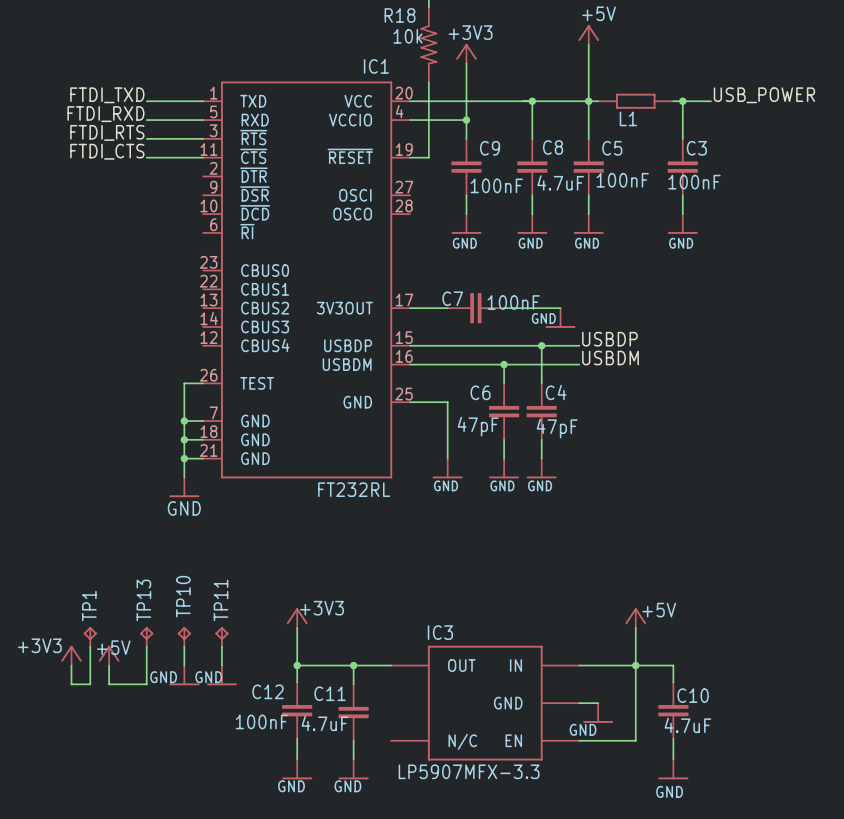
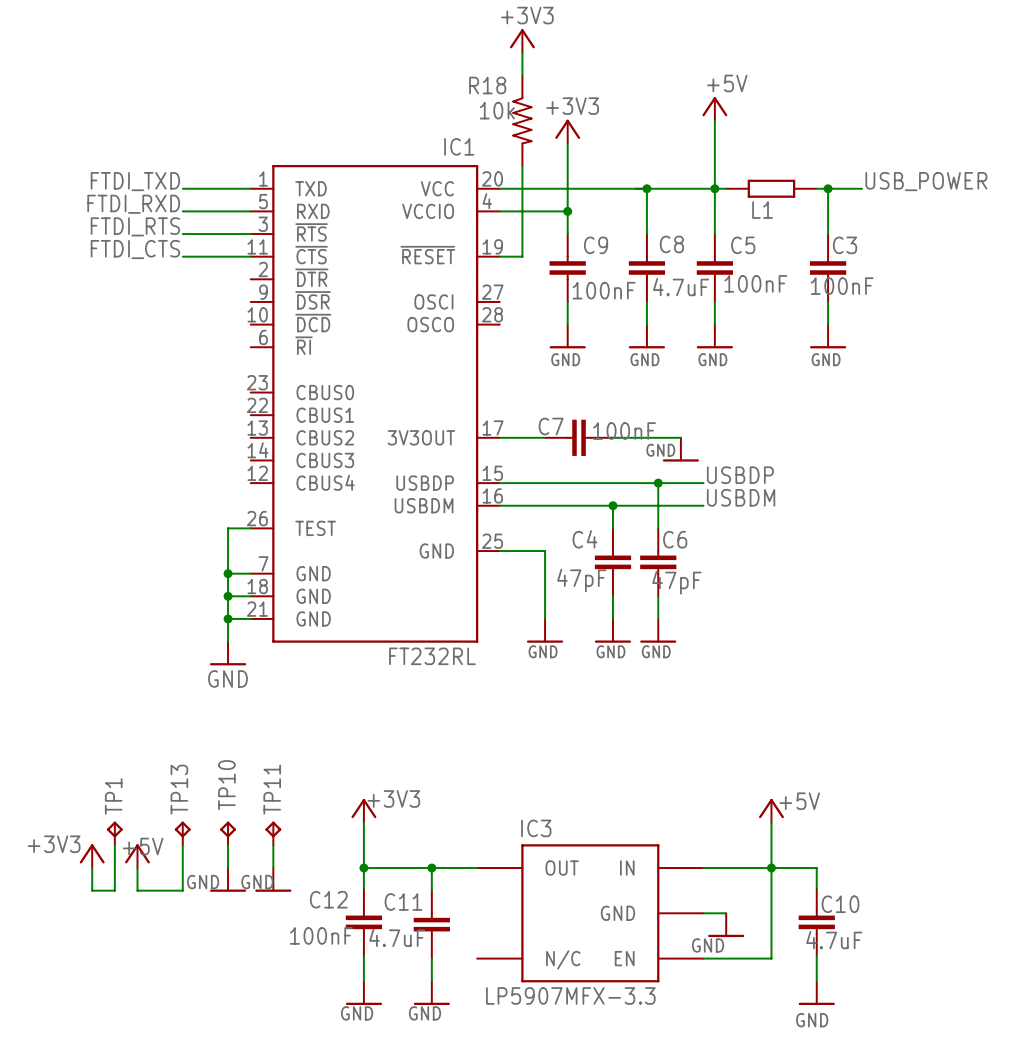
C6 name: C6 (480, 392) -> C4 (584, 539)
C4 name: C4 (556, 392) -> C6 (675, 539)

